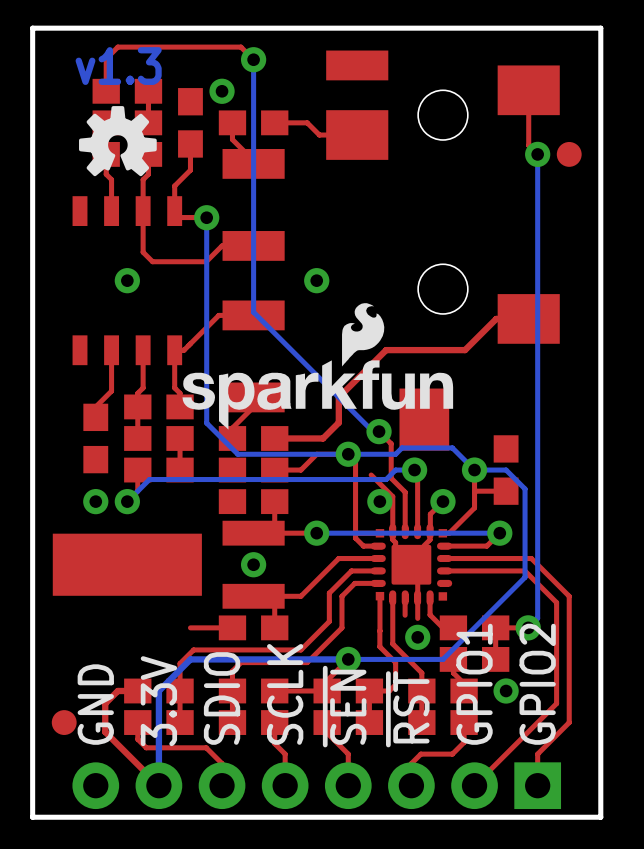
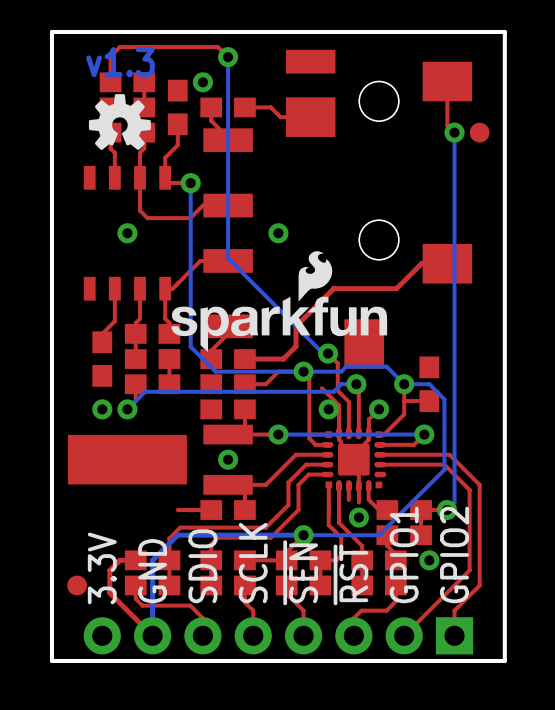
text: 3.3V (158, 701) -> GND (152, 571)
text: GND (95, 704) -> 3.3V (102, 568)

